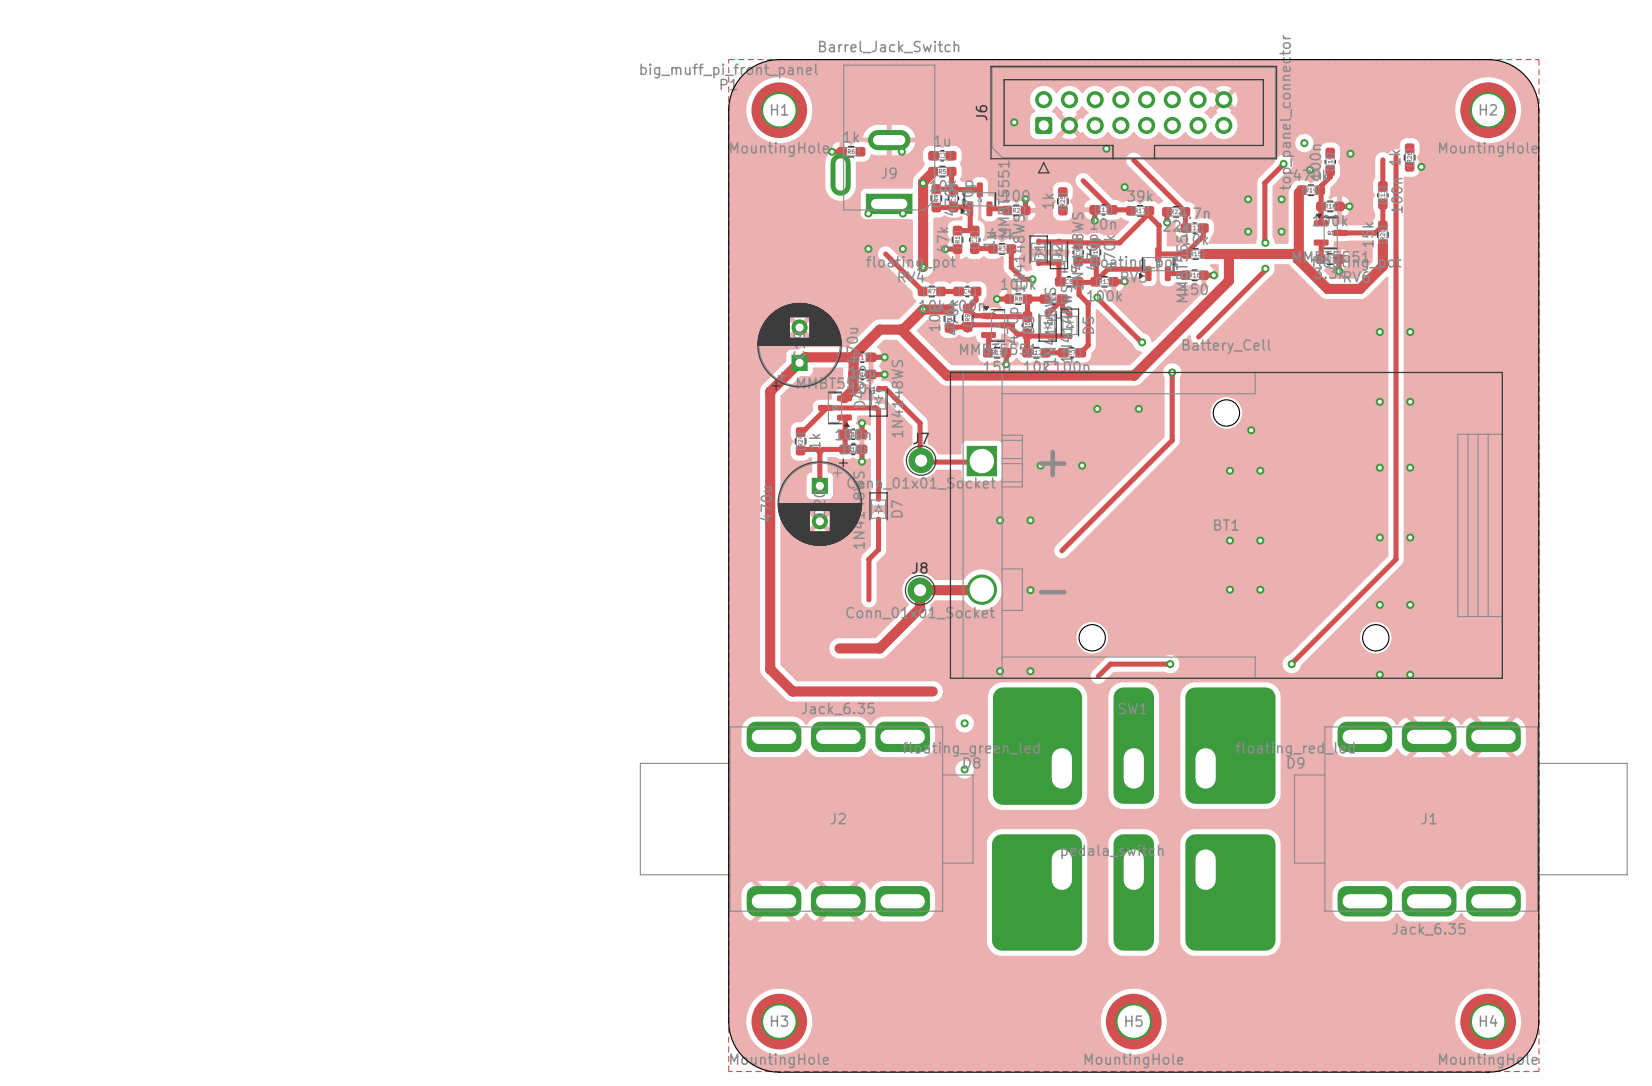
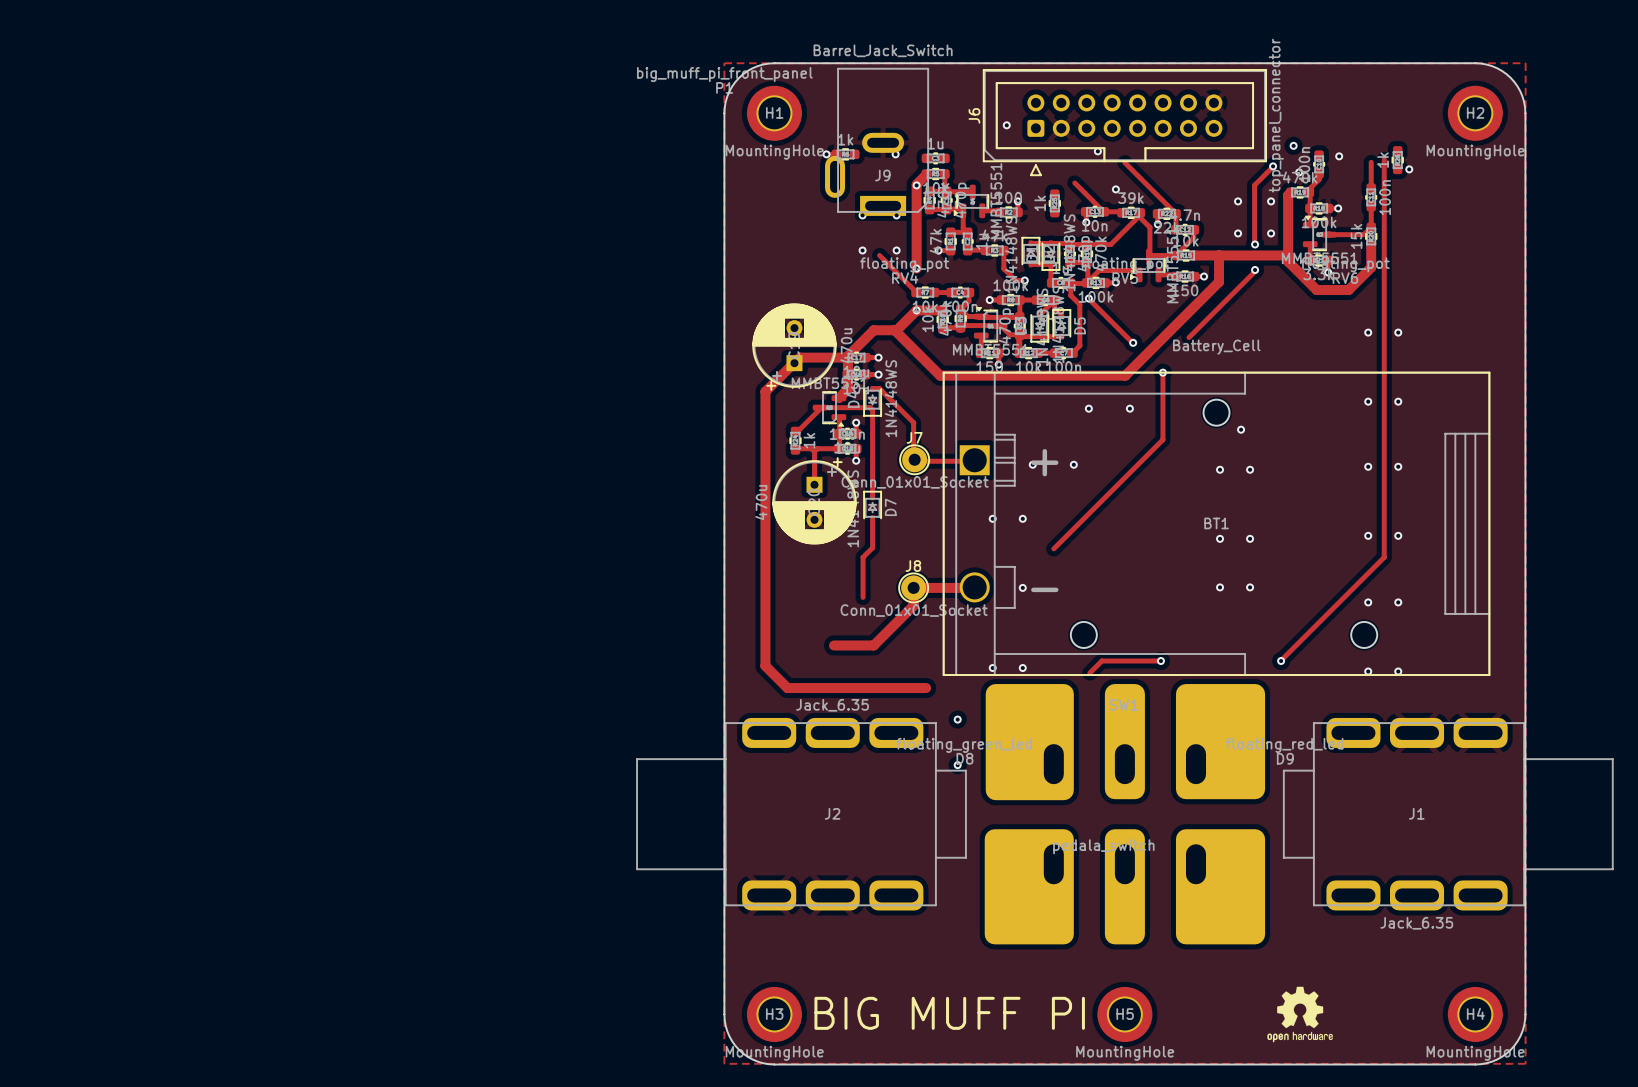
drawing: none -> [1267, 986, 1333, 1043]
text: none -> BIG MUFF PI (949, 1013)

